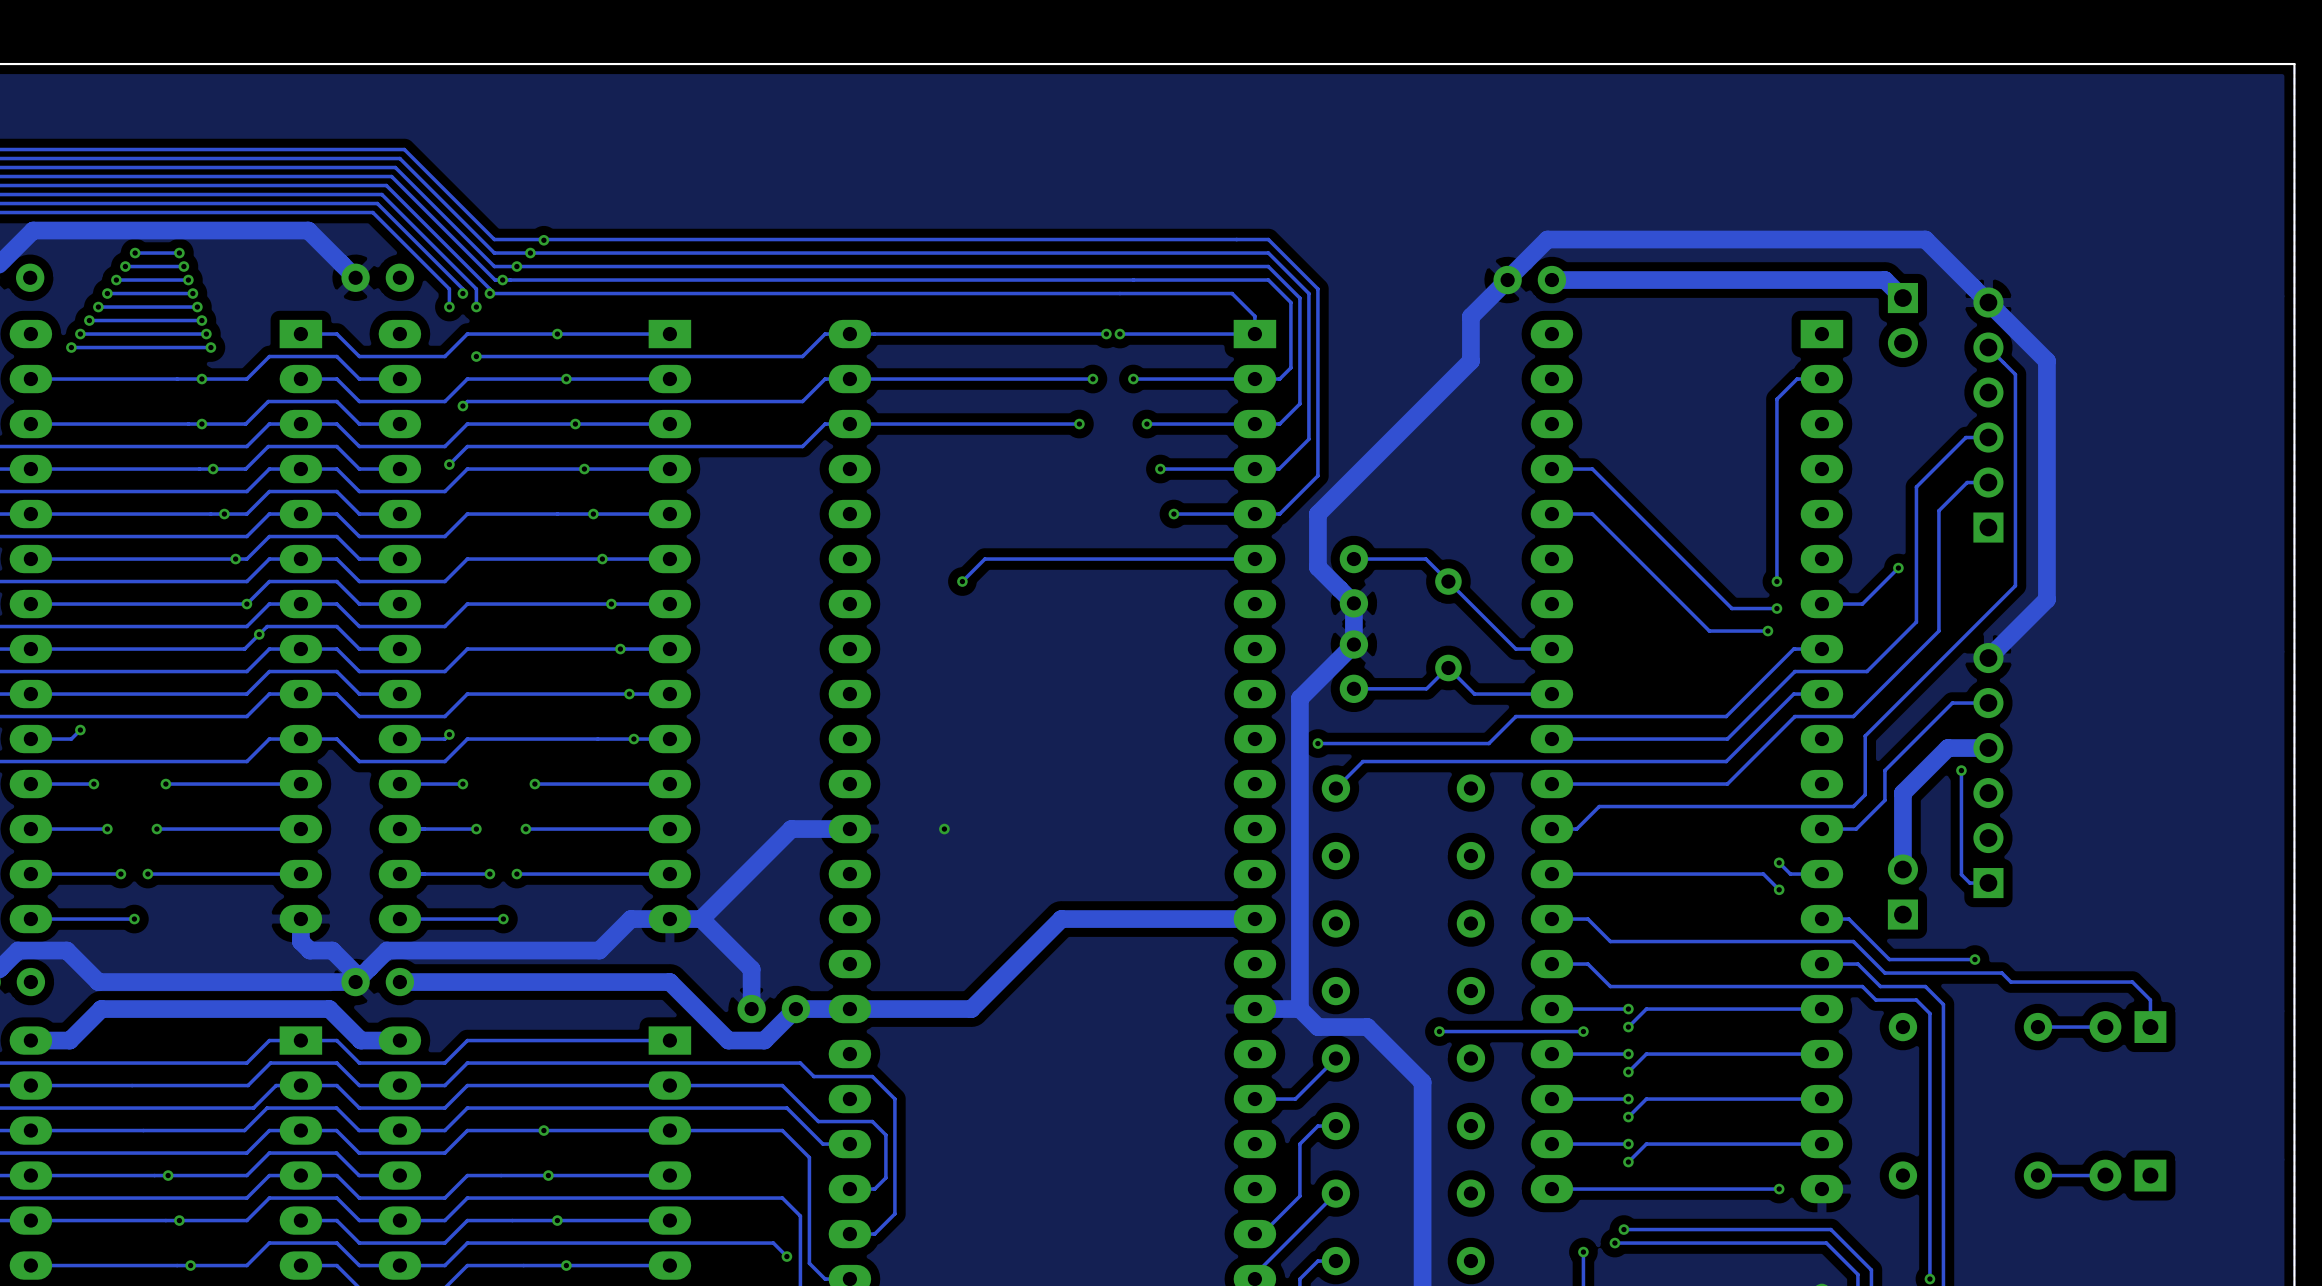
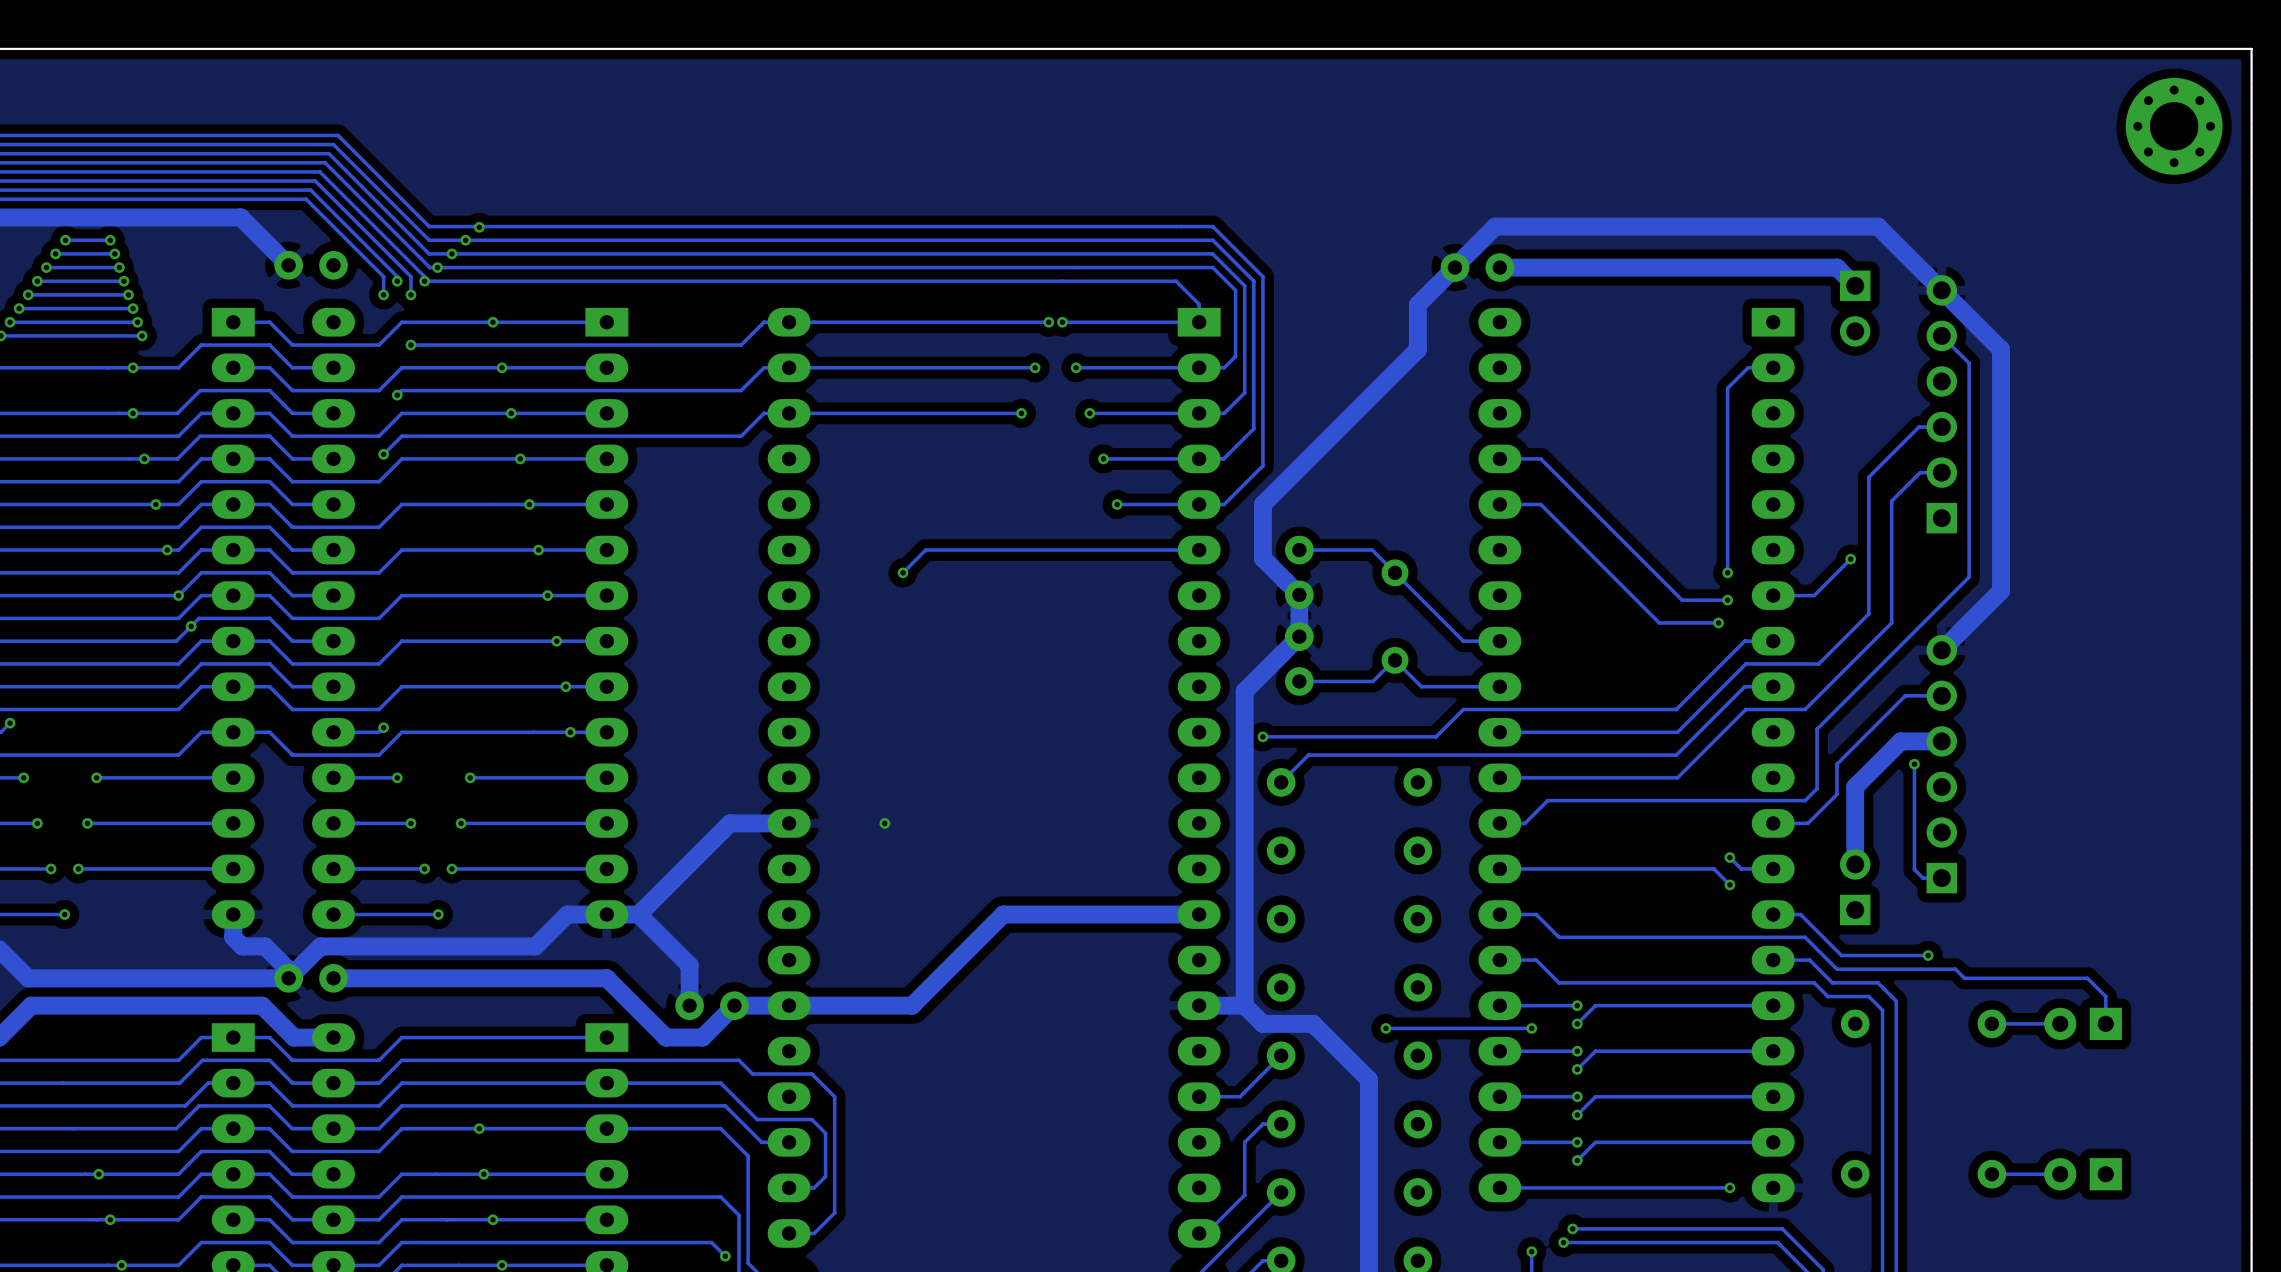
part: none -> (2174, 126)

